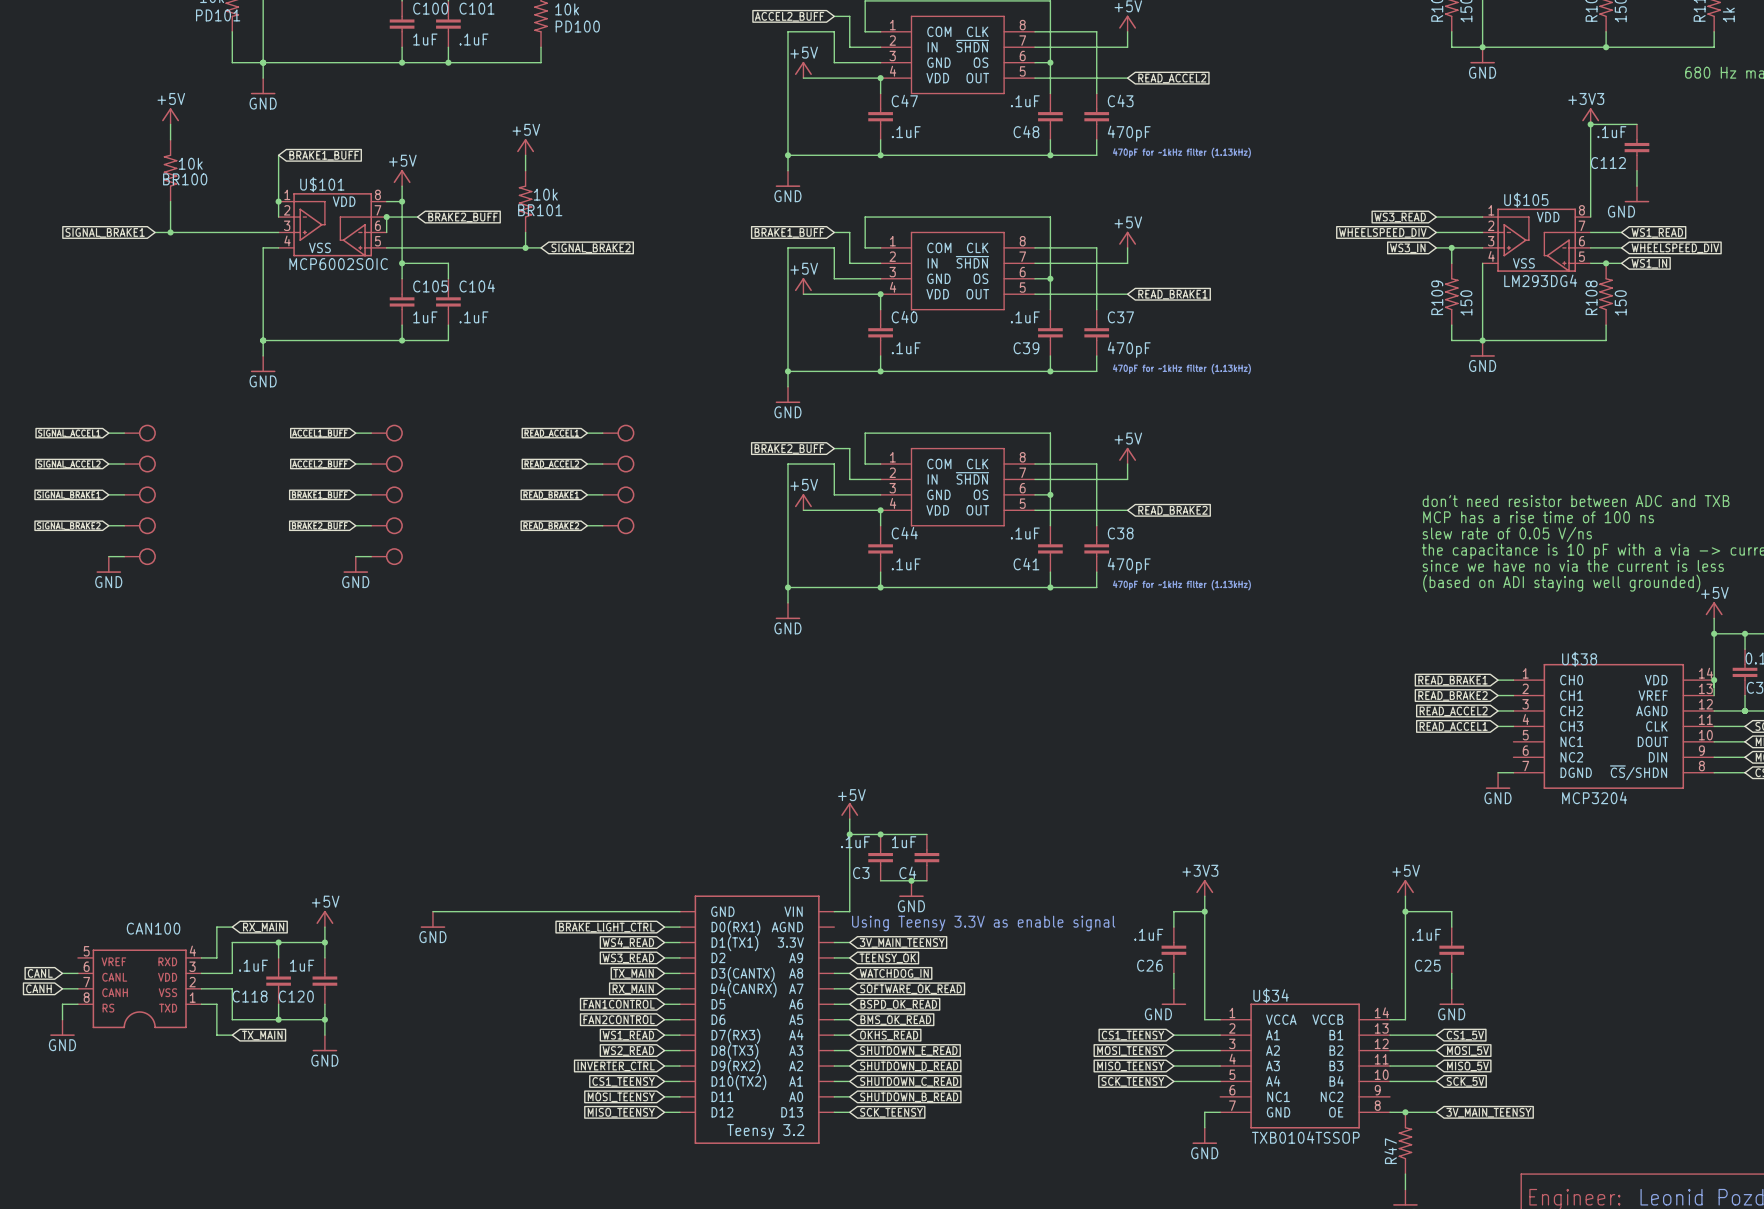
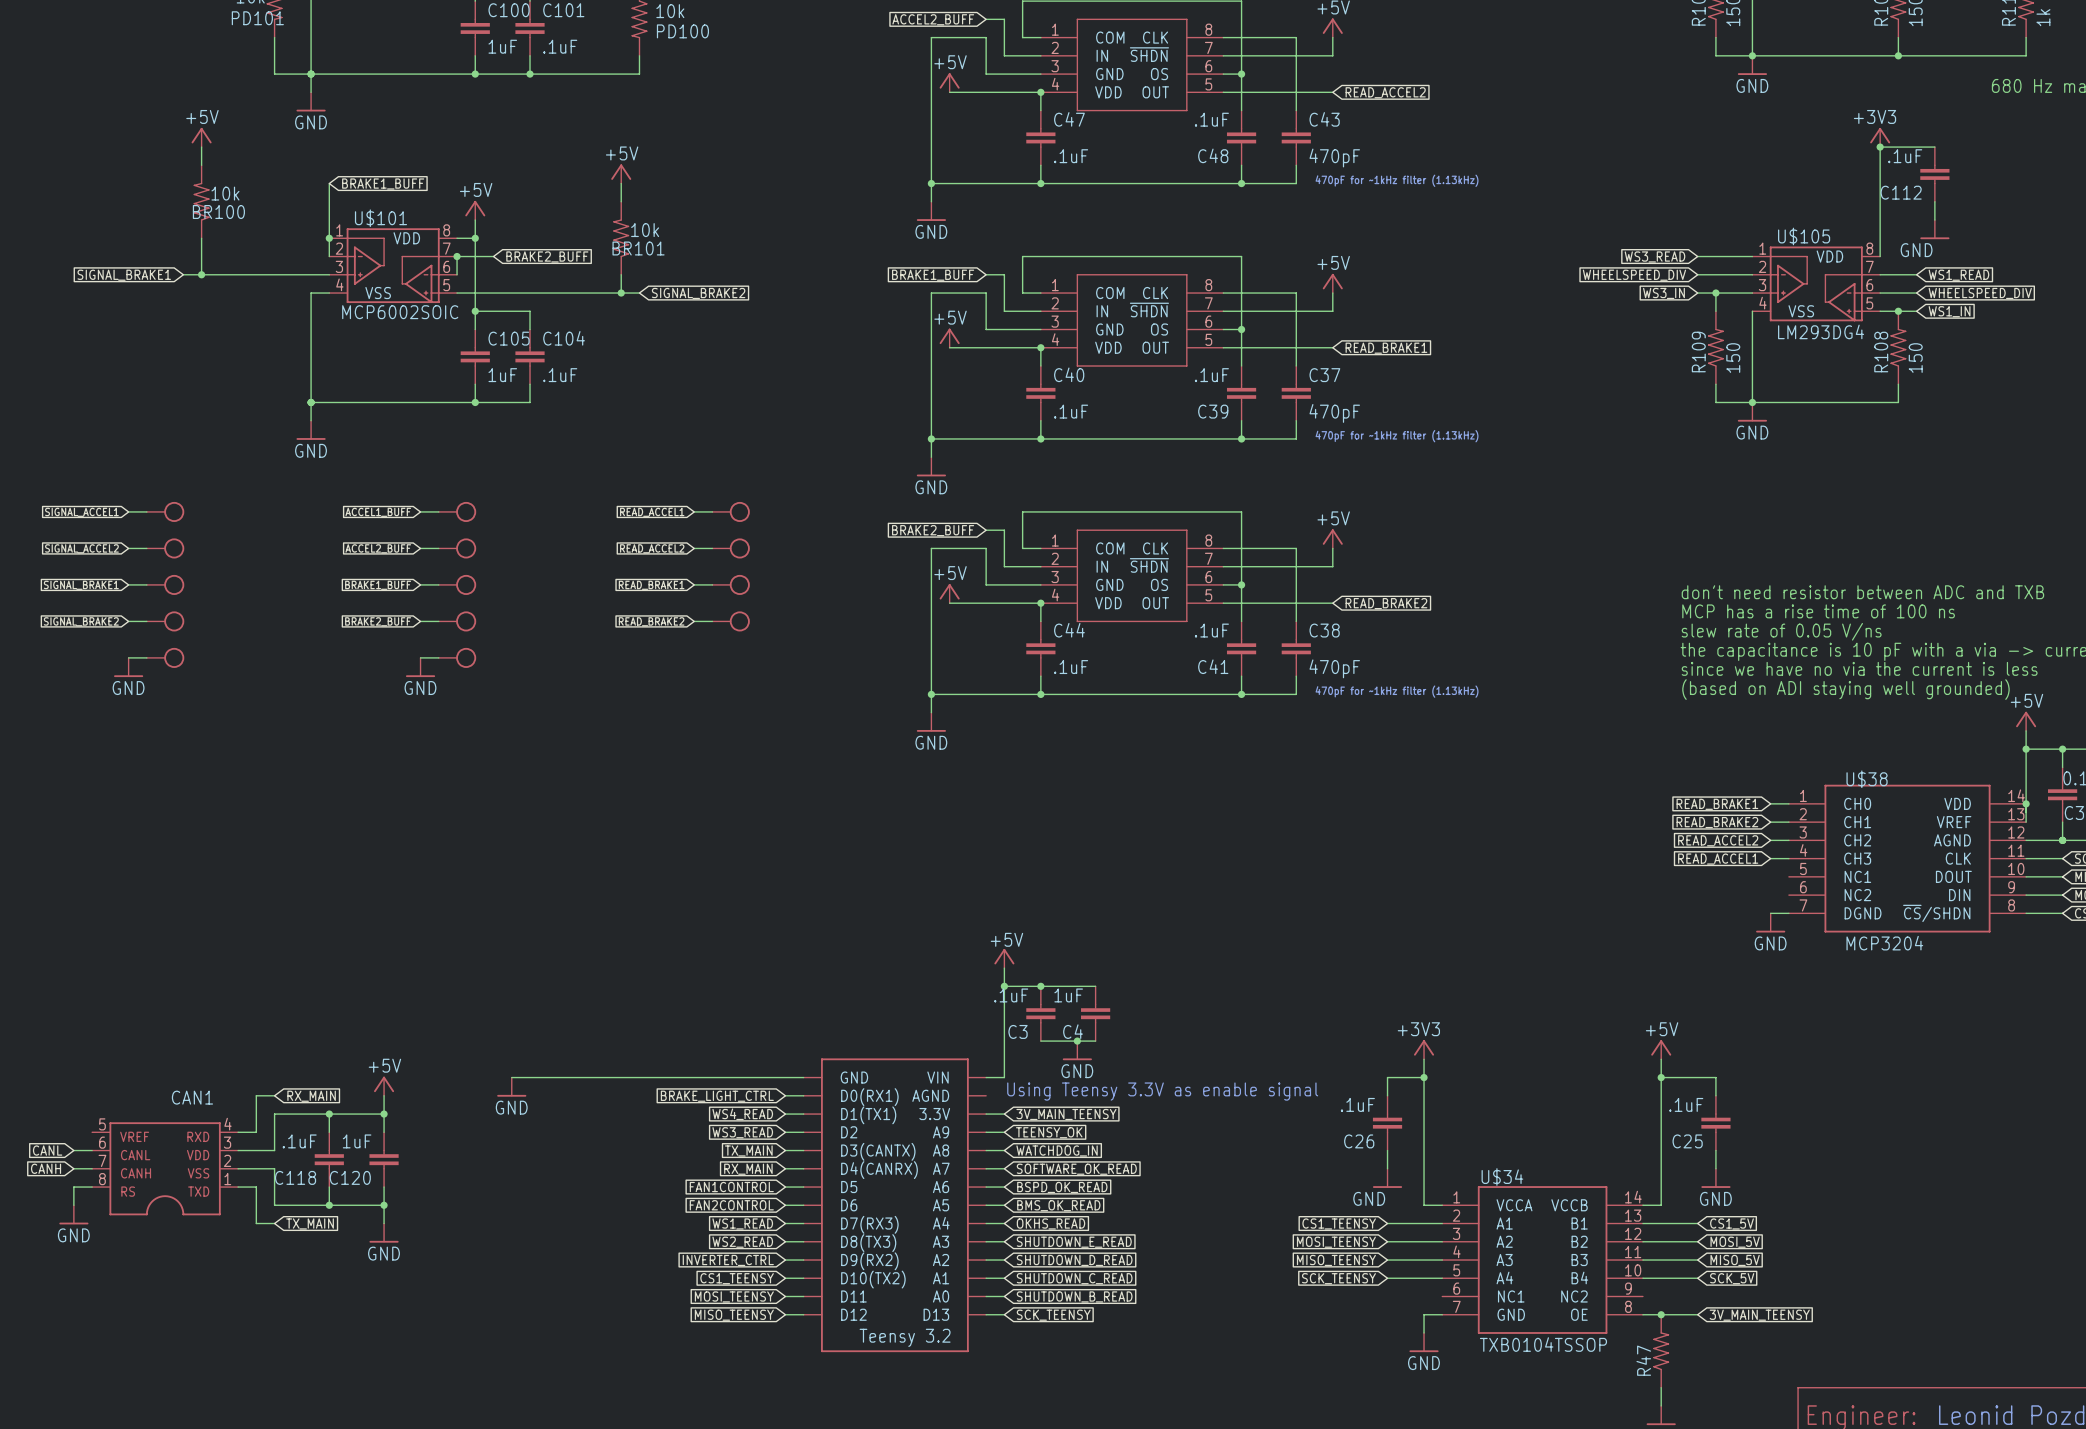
CAN100 name: CAN100 (153, 928) -> CAN1 (192, 1097)

